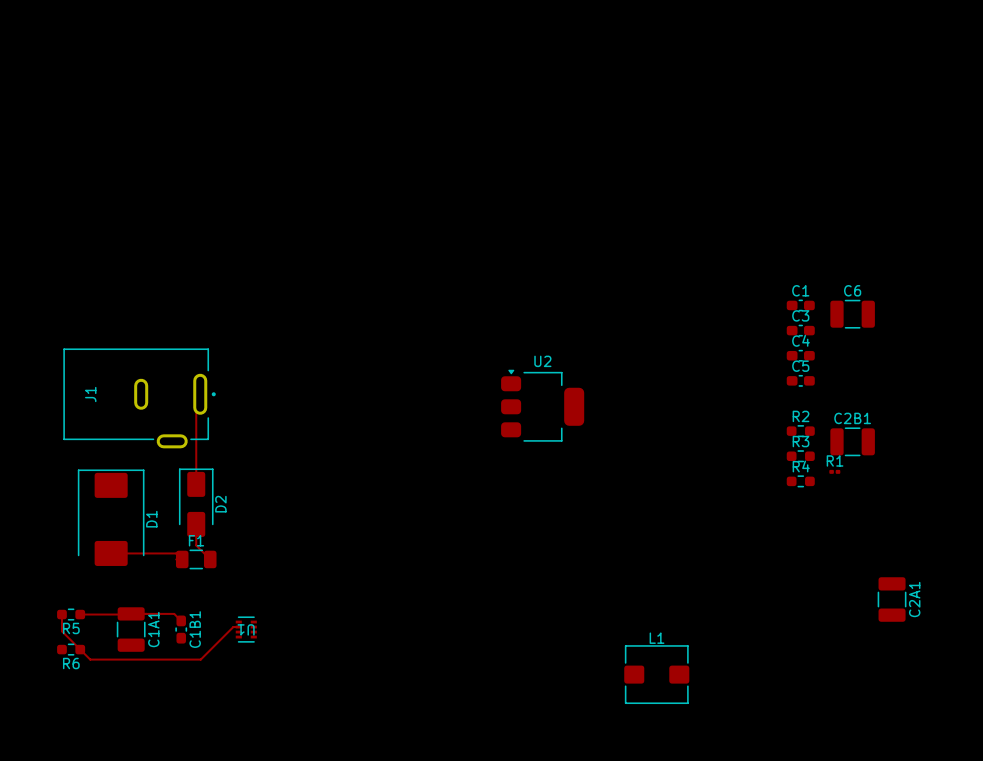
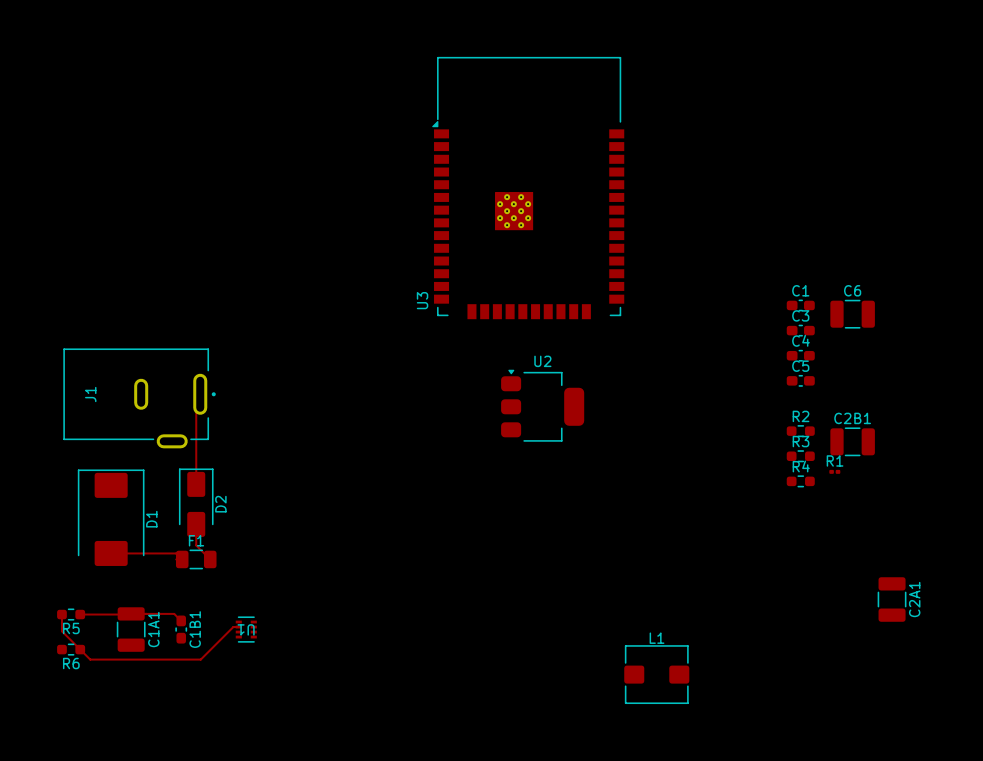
U3: none -> (528, 188)

